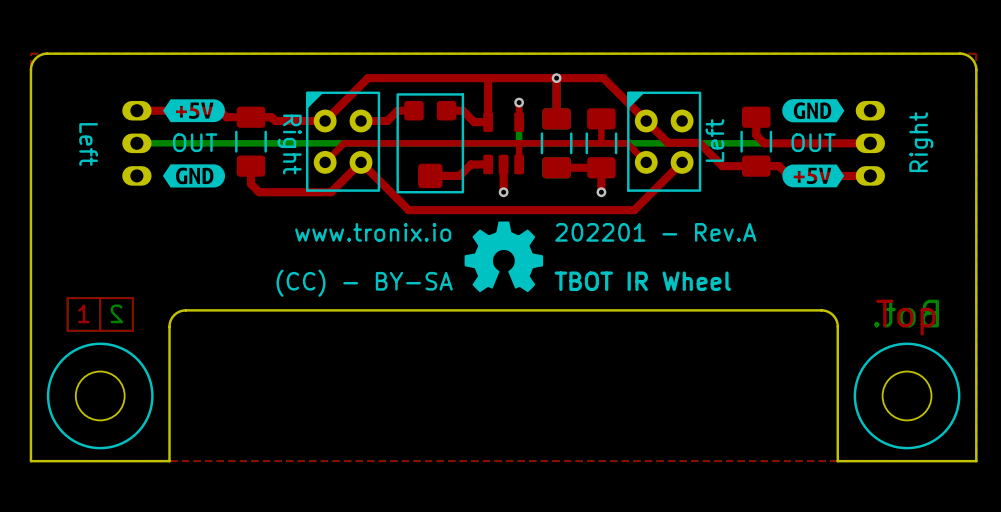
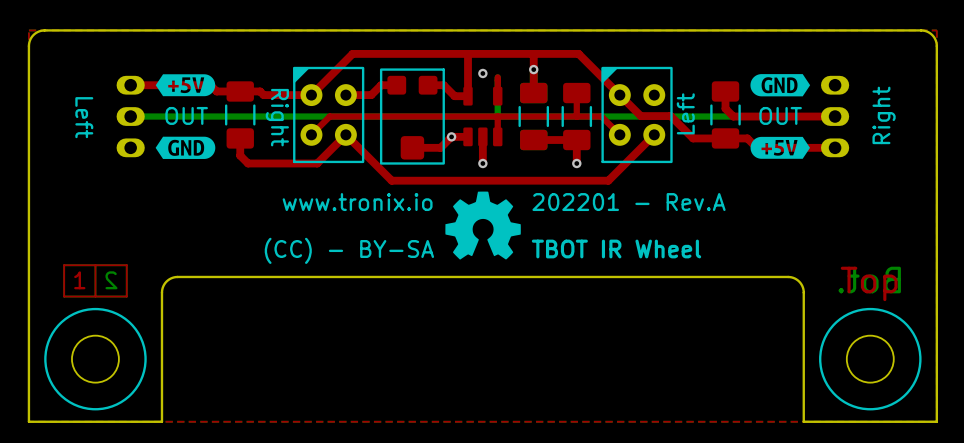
via position: (556, 78) -> (533, 69)
via position: (519, 102) -> (482, 73)
via: none -> (451, 136)

